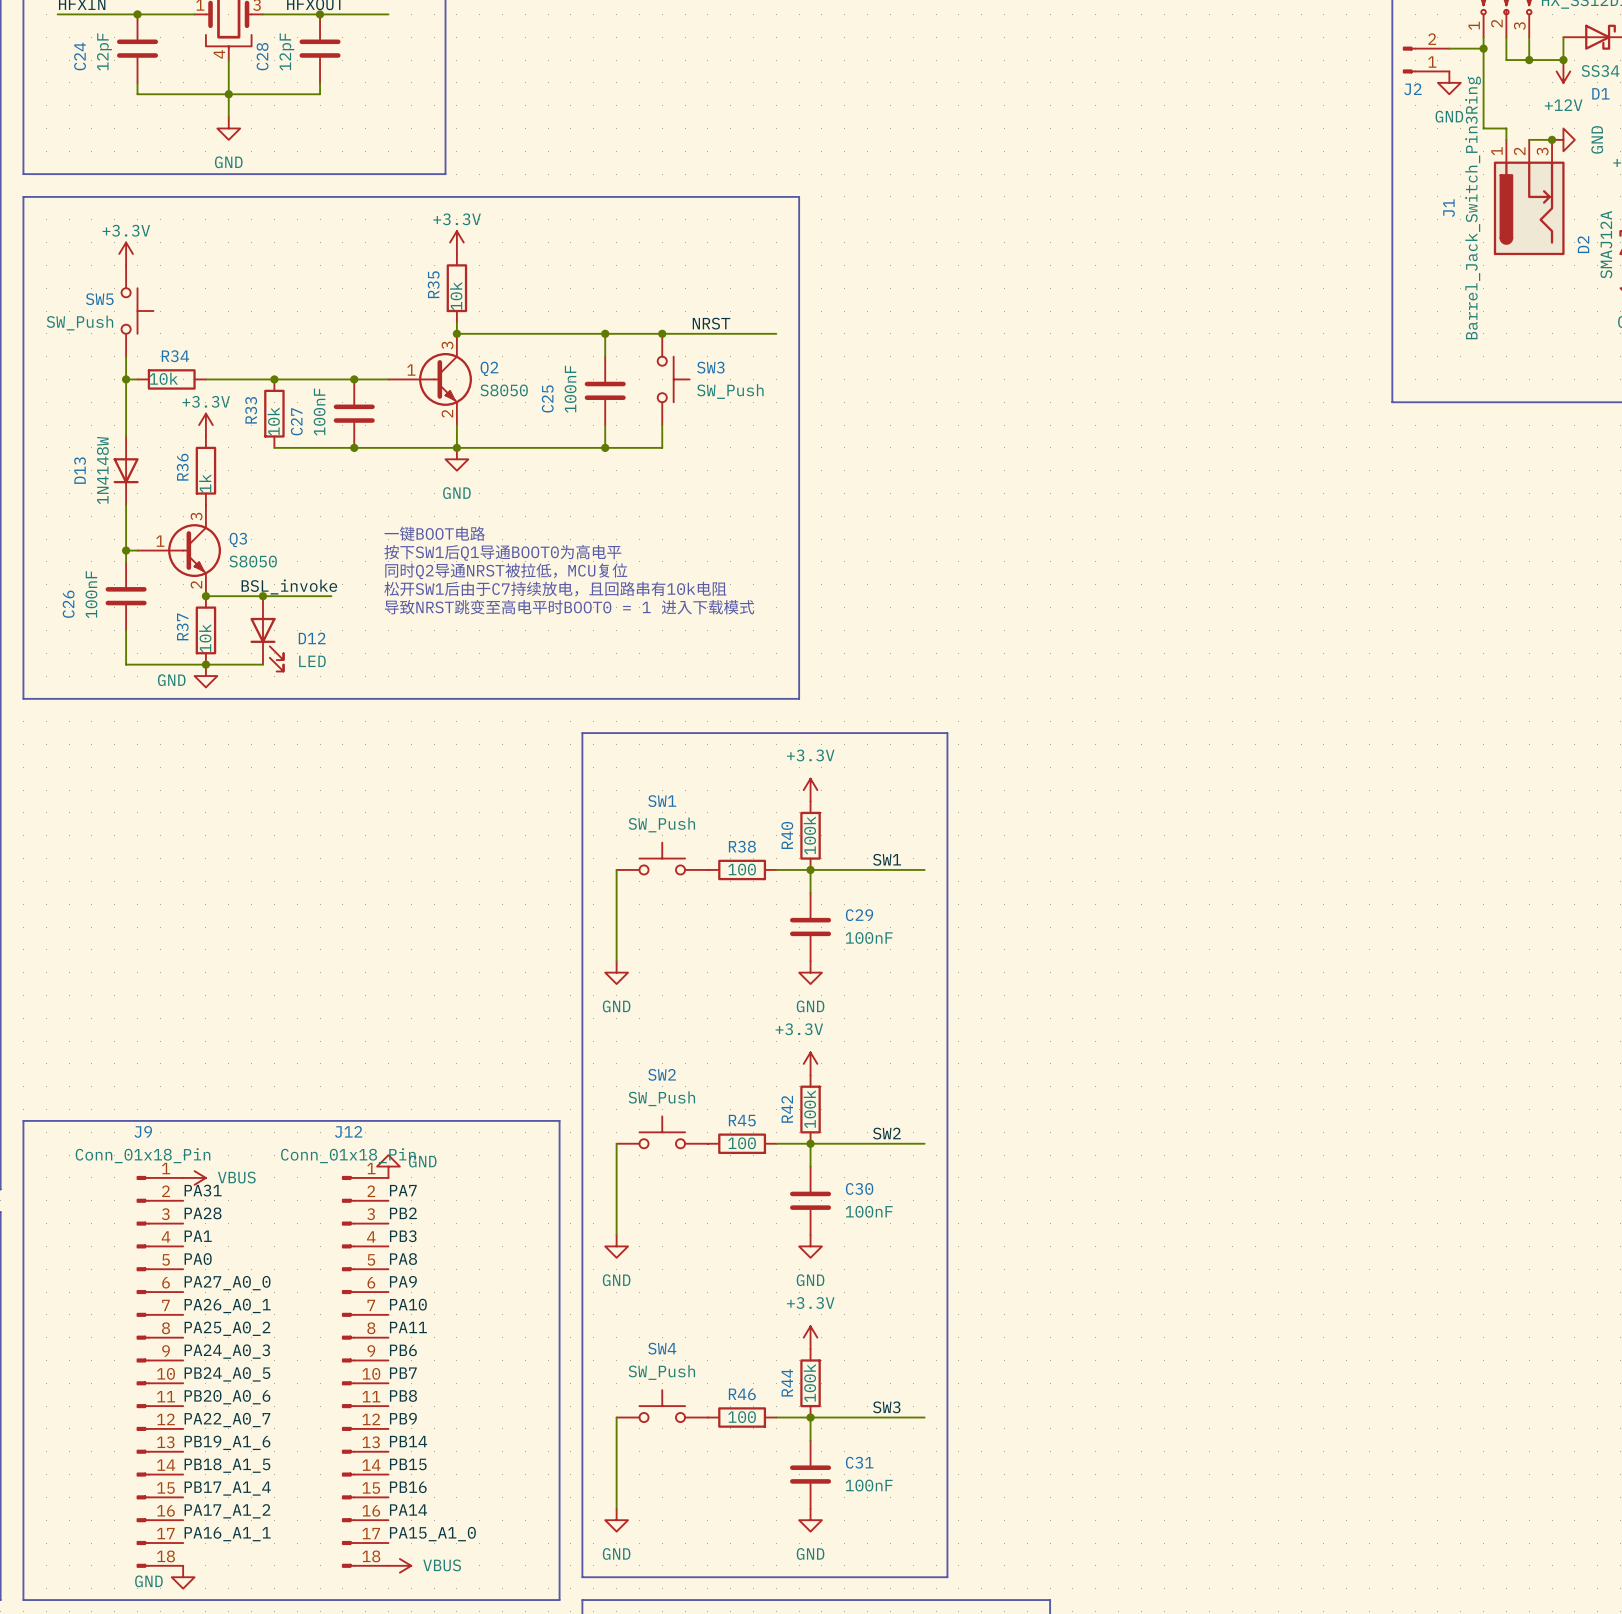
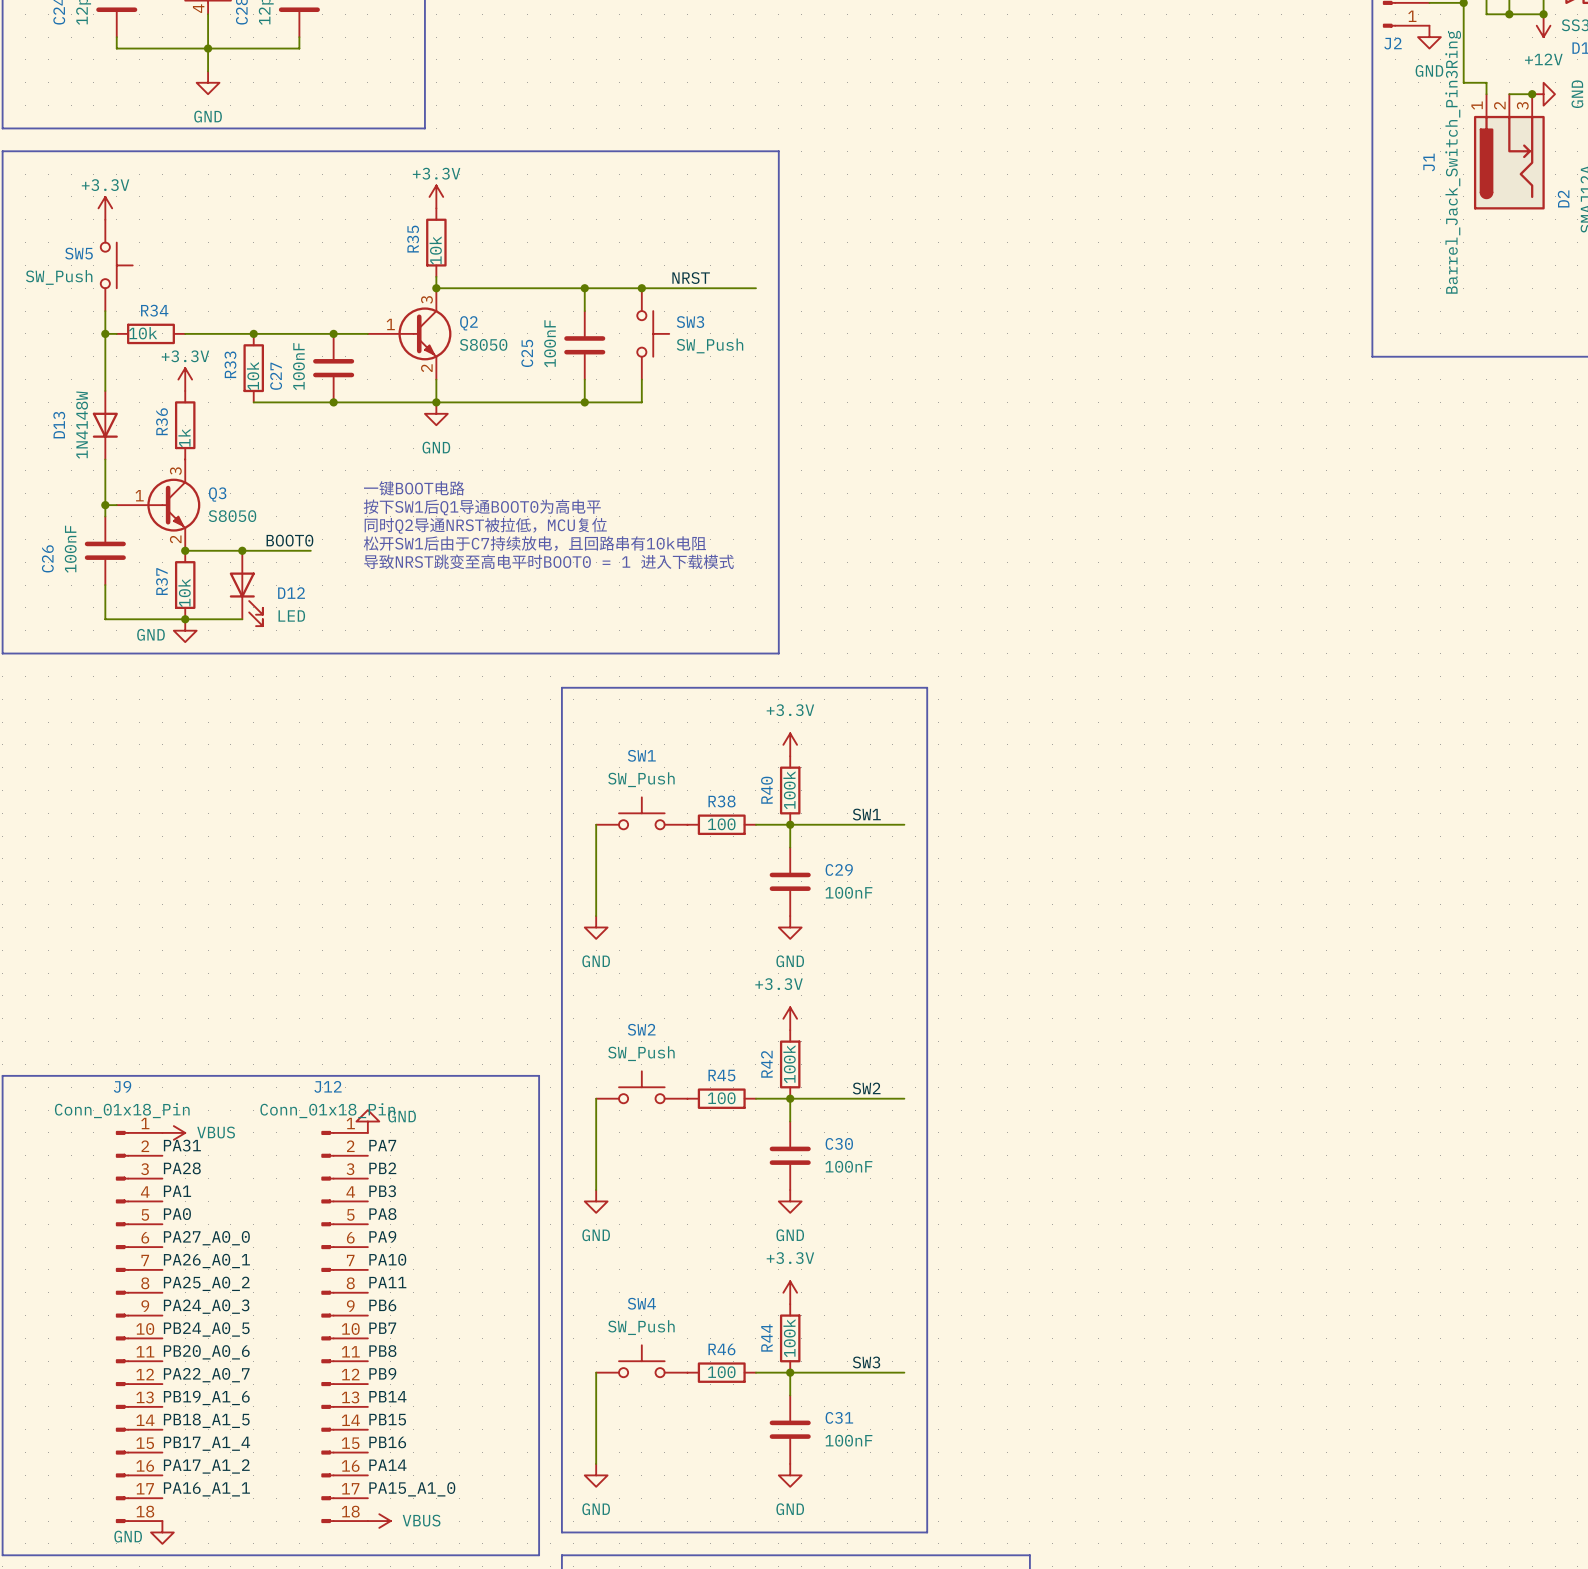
label: BSL_invoke (289, 586) -> none
label: none -> BOOT0 (289, 540)

